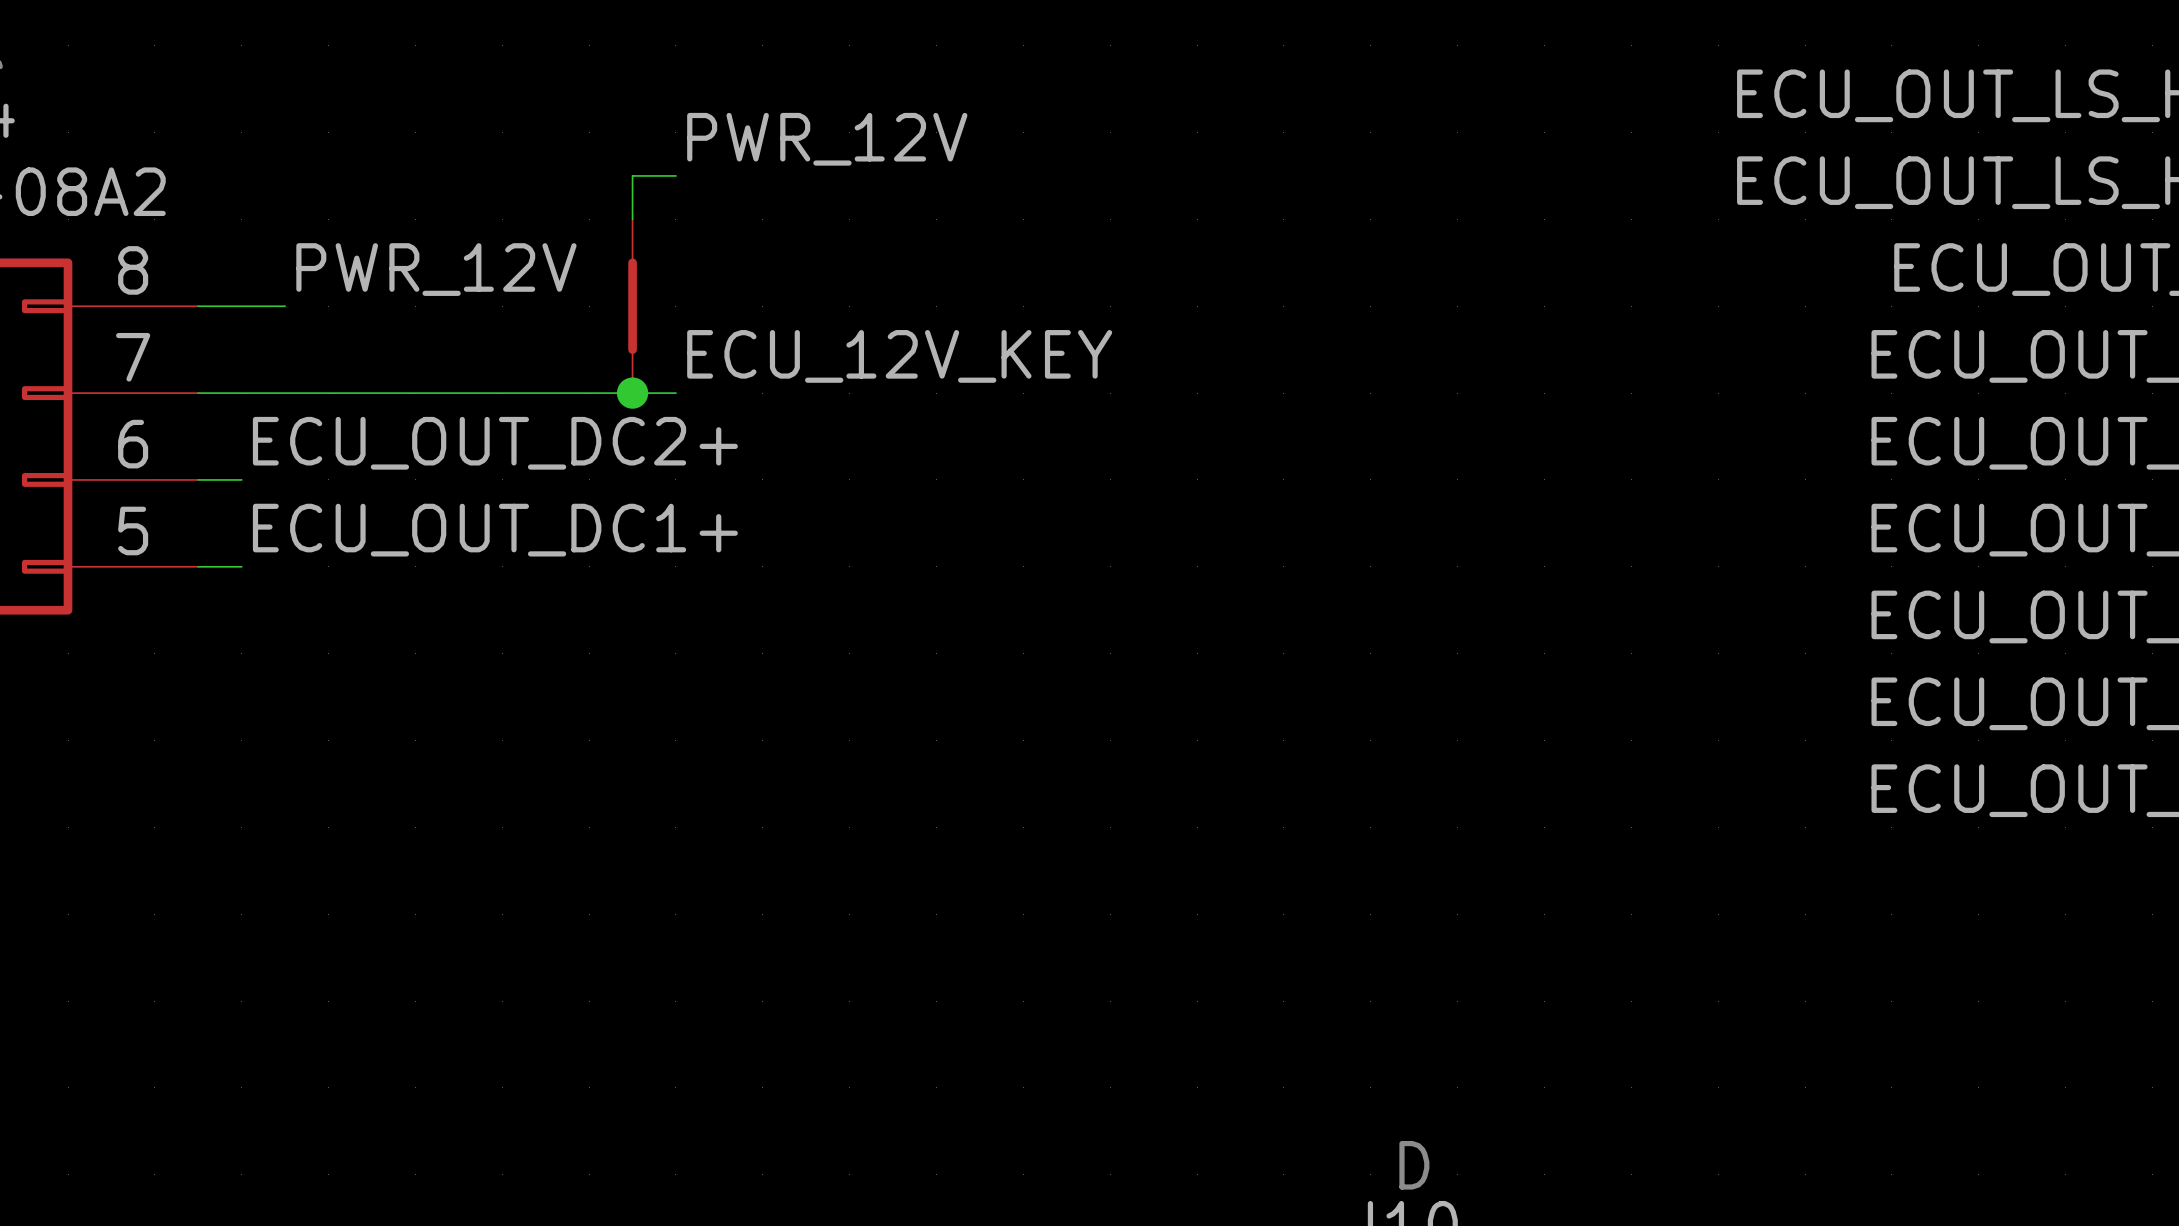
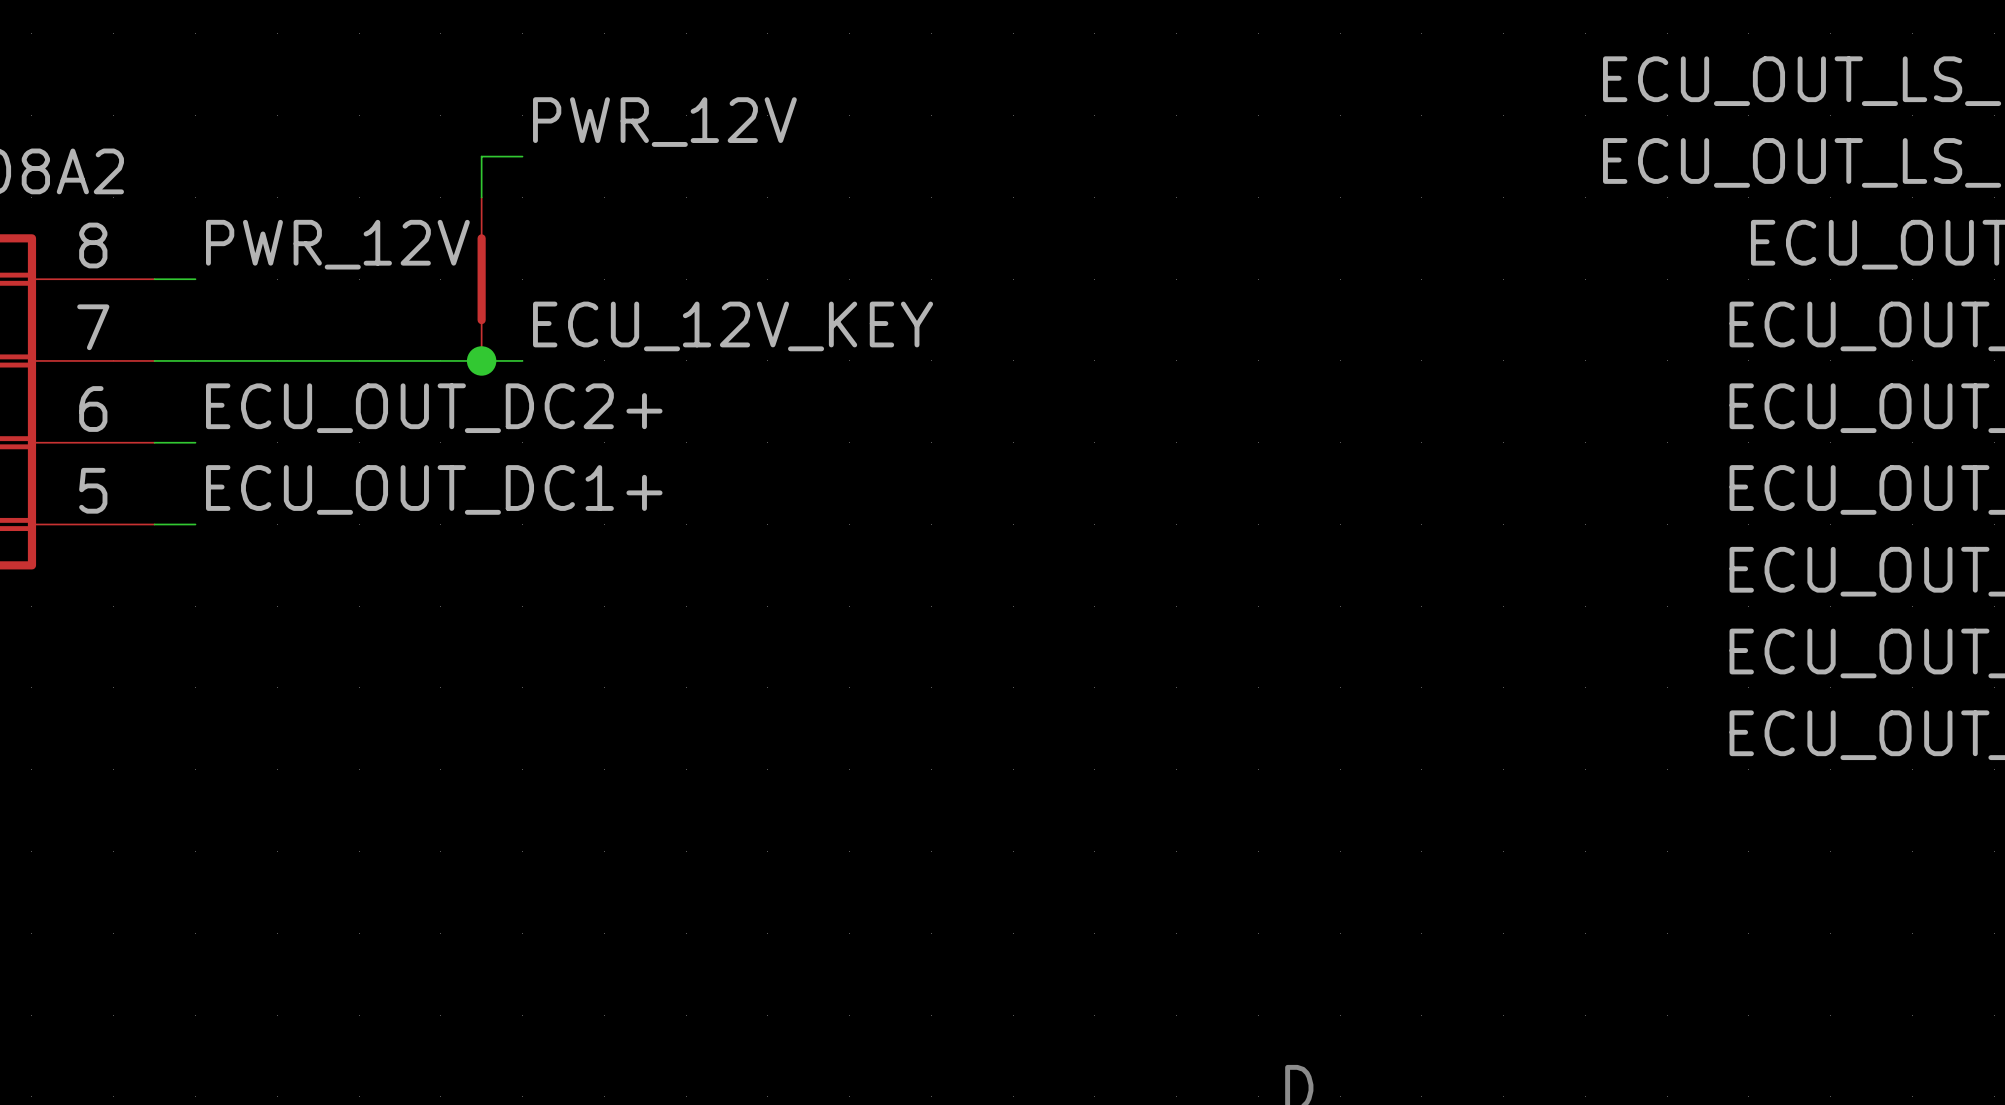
label position: PWR_12V (827, 139) -> PWR_12V (664, 122)
wire: (675, 175) (632, 175) (632, 219) -> (522, 156) (481, 156) (481, 197)
label position: PWR_12V (436, 269) -> PWR_12V (337, 244)
wire: (241, 306) (285, 306) -> none
part position: (632, 306) -> (481, 279)
label position: ECU_12V_KEY (899, 356) -> ECU_12V_KEY (733, 326)
wire: (589, 393) (675, 393) -> none
junction position: (632, 393) -> (481, 360)

